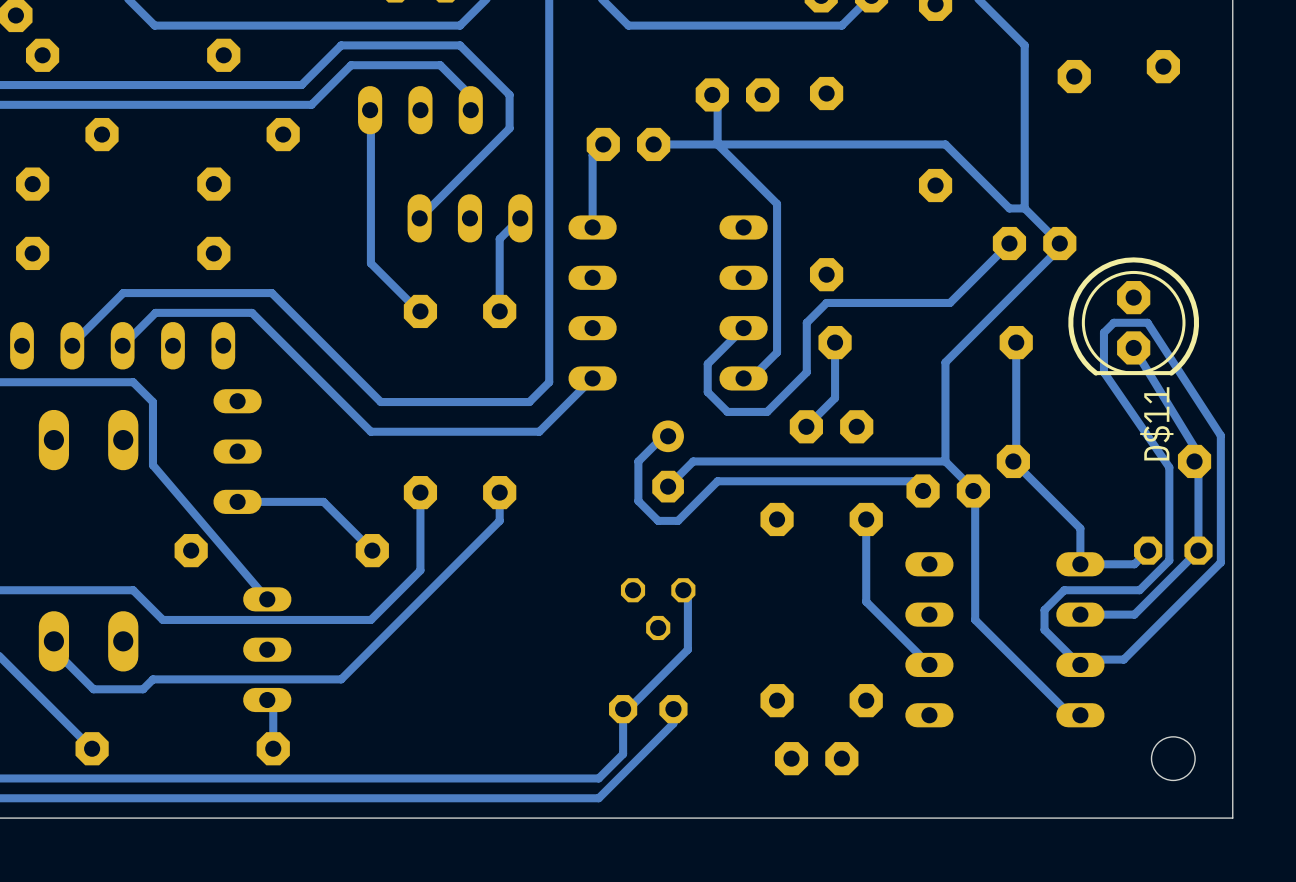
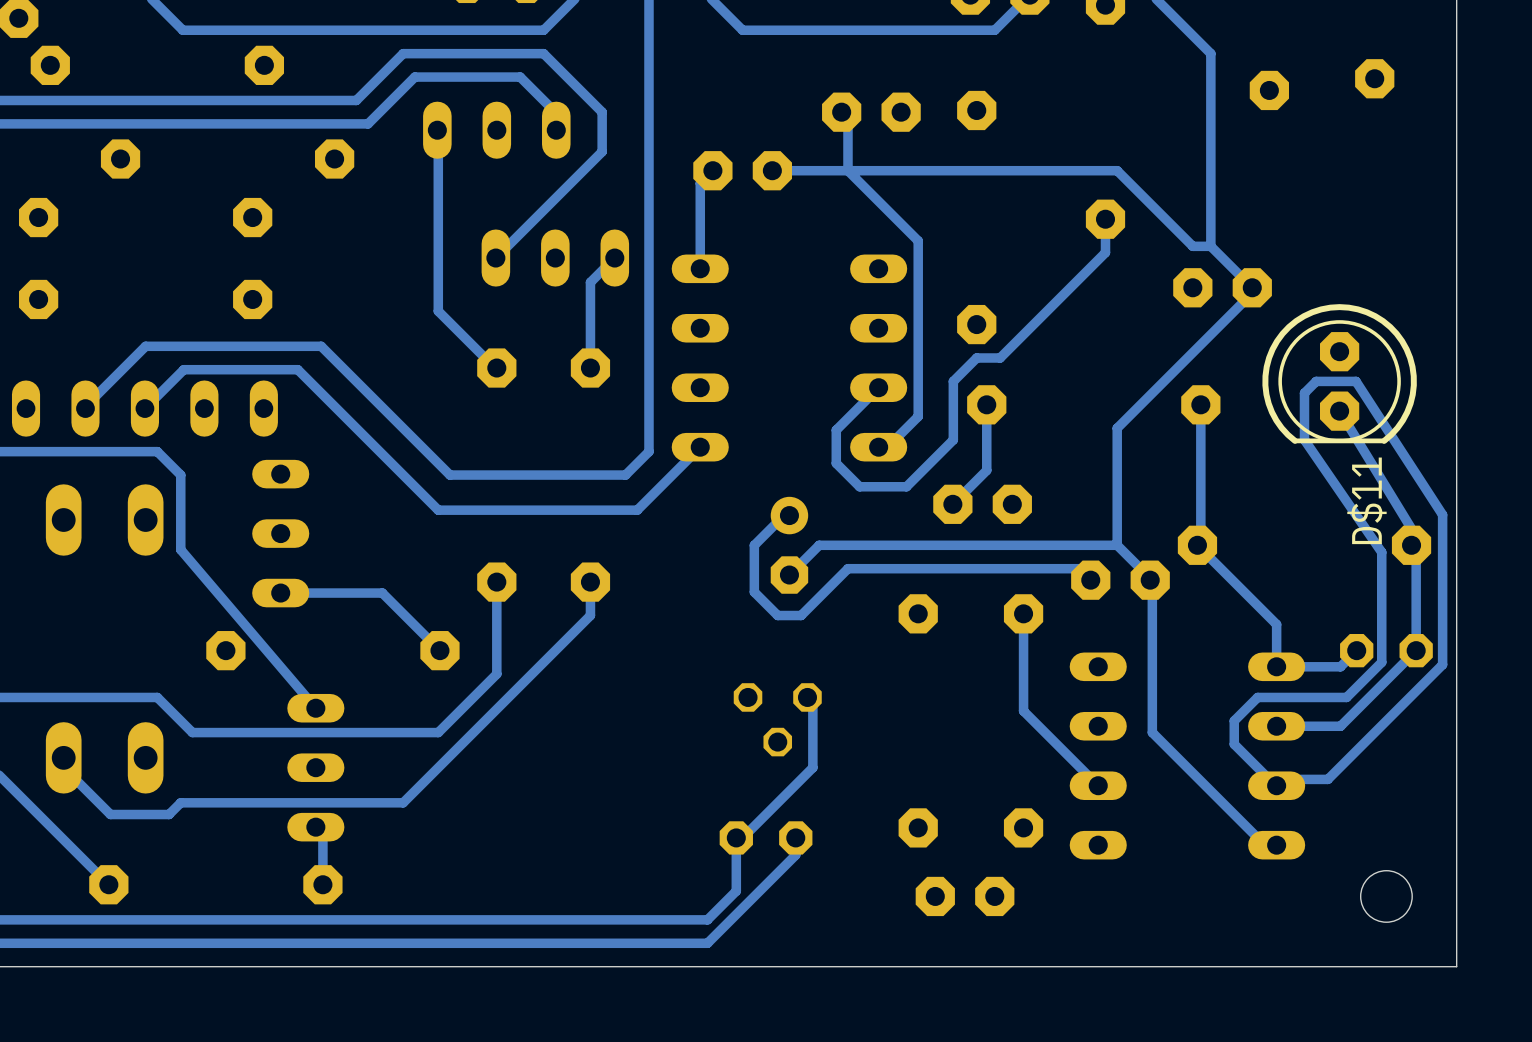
track: (1009, 243) (950, 302) (846, 302) -> (1105, 219) (1105, 252) (1000, 358)

